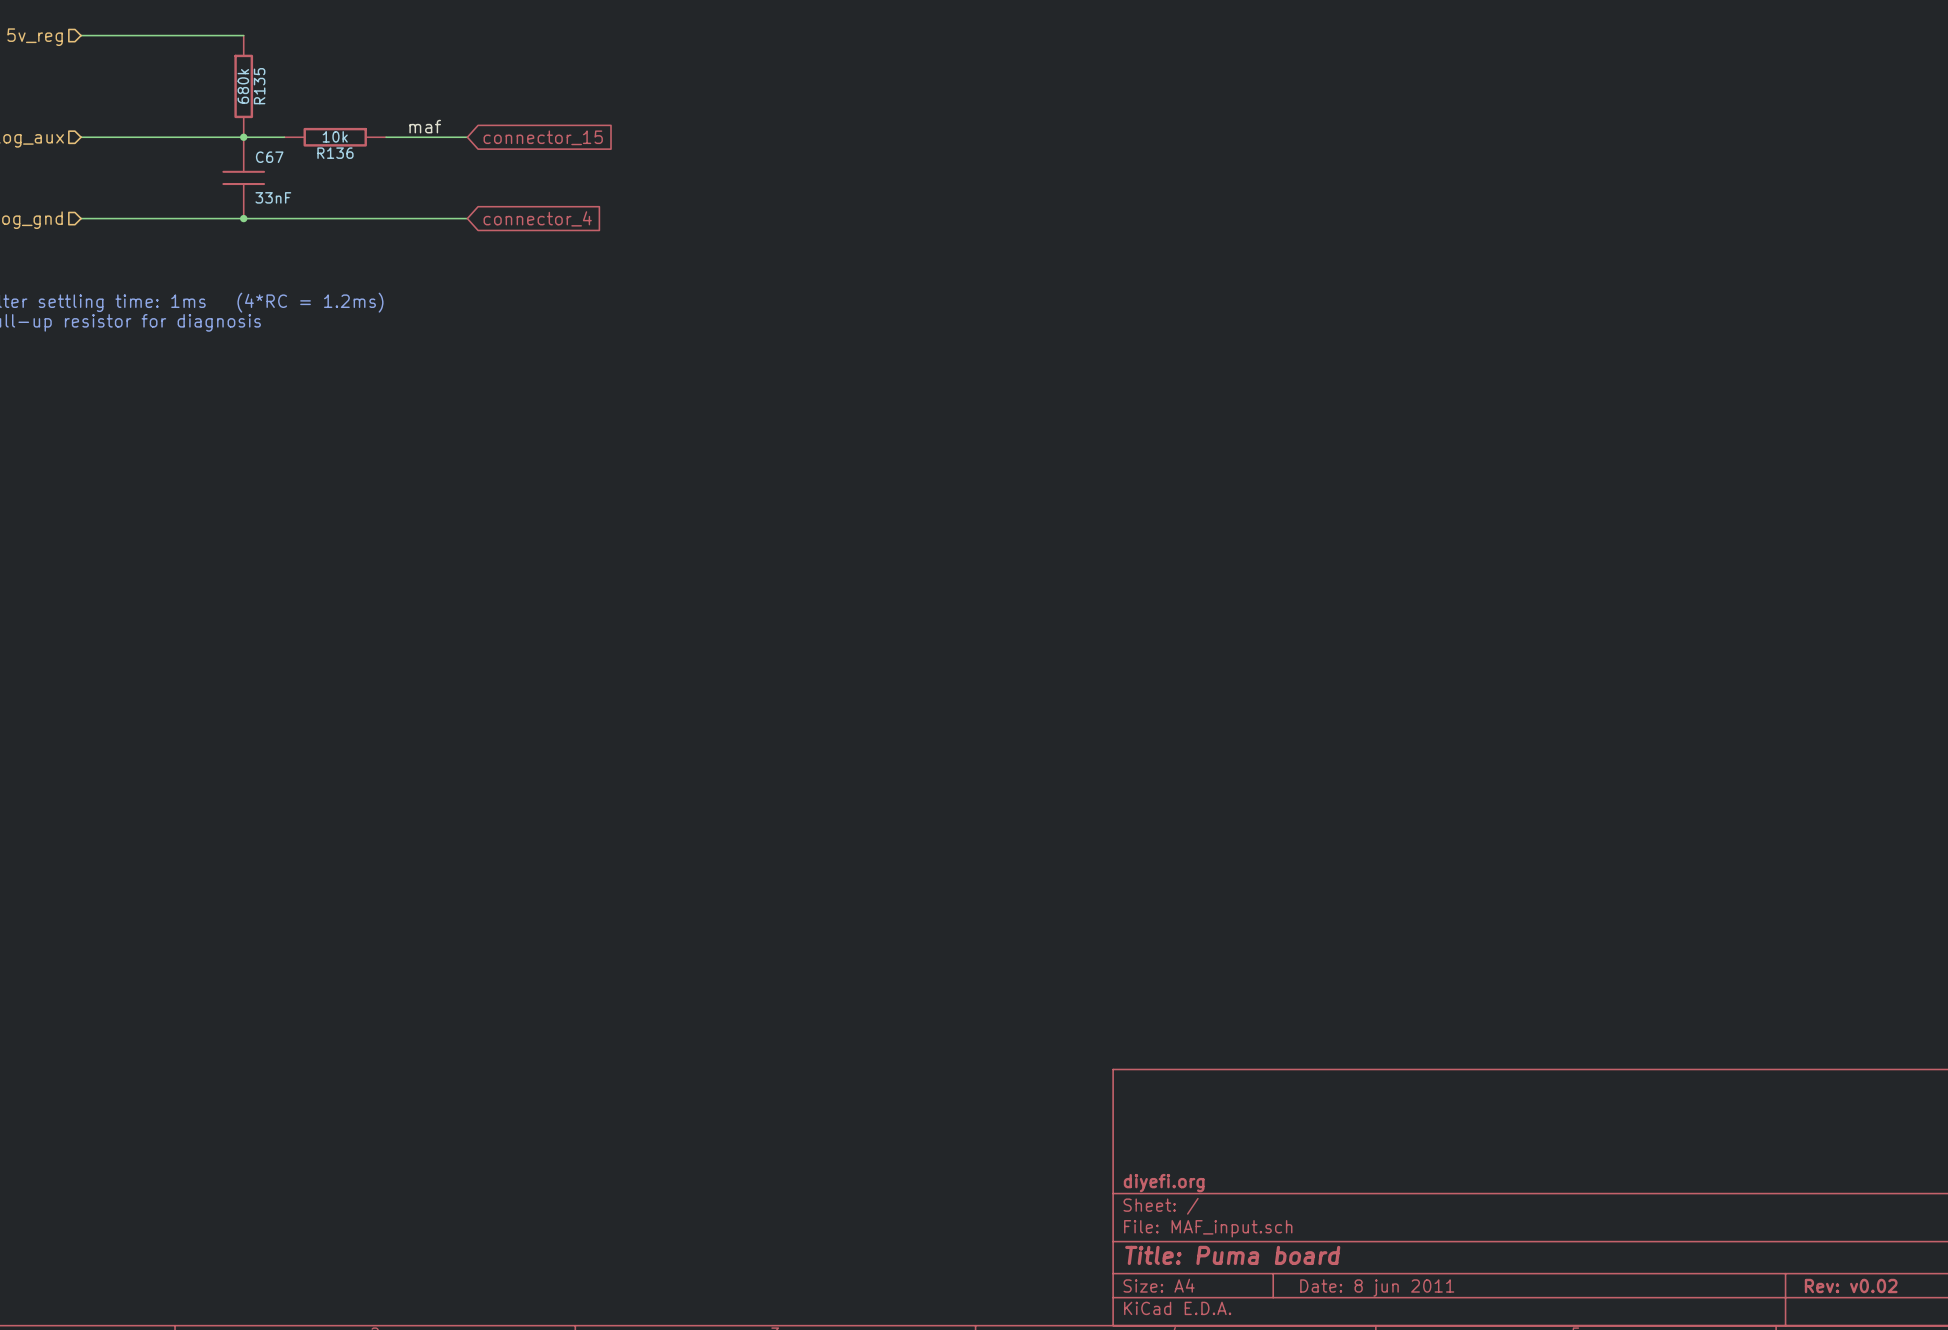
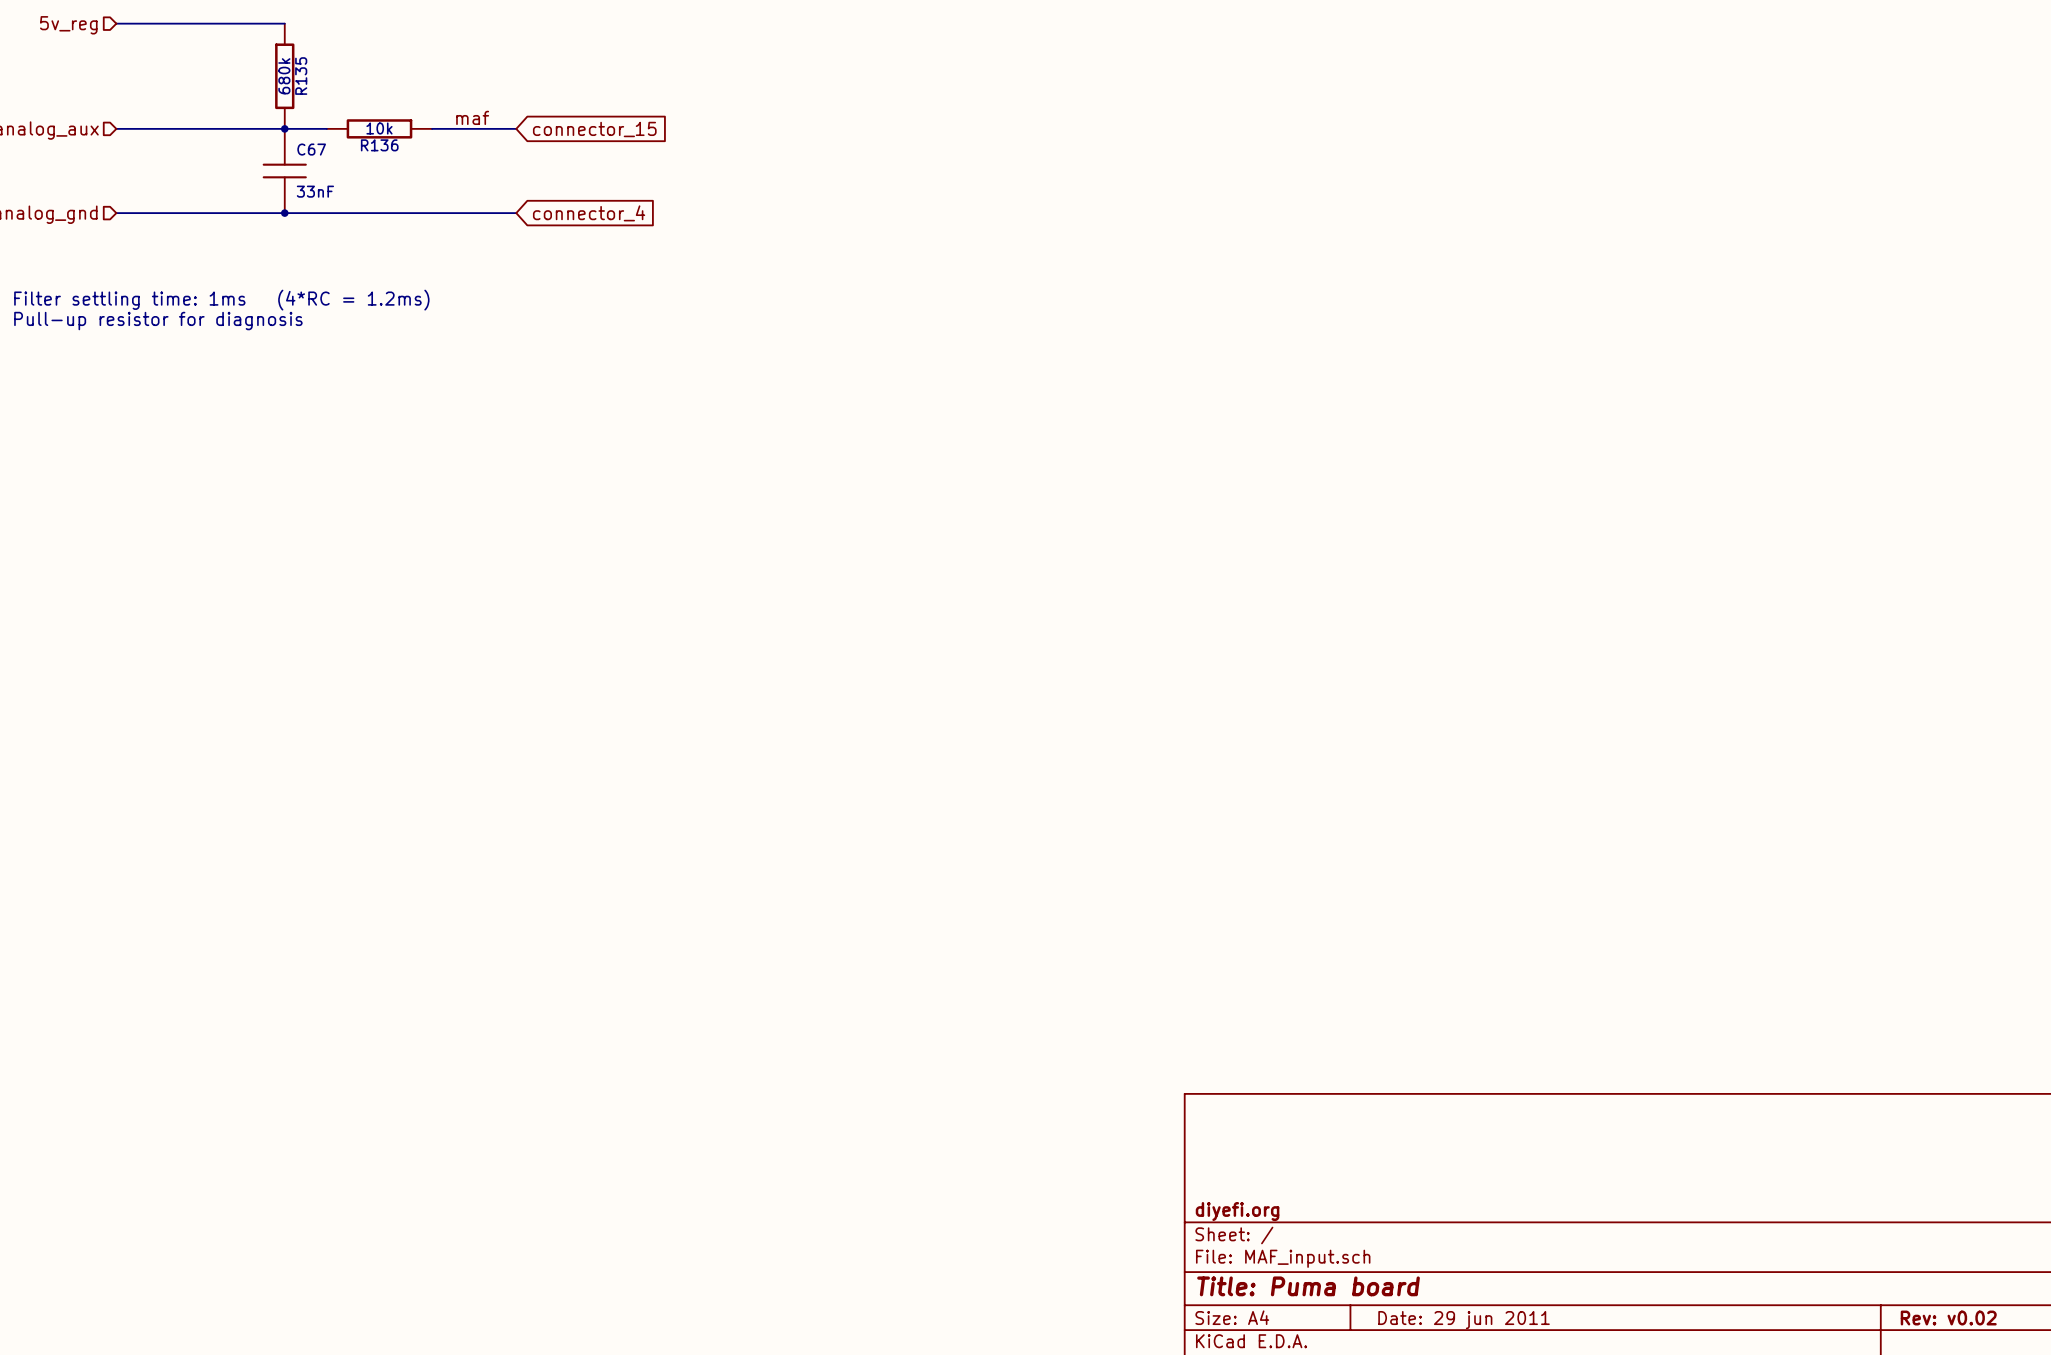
title block: Date: 8 jun 2011 (1377, 1287) -> Date: 29 jun 2011 (1464, 1320)

